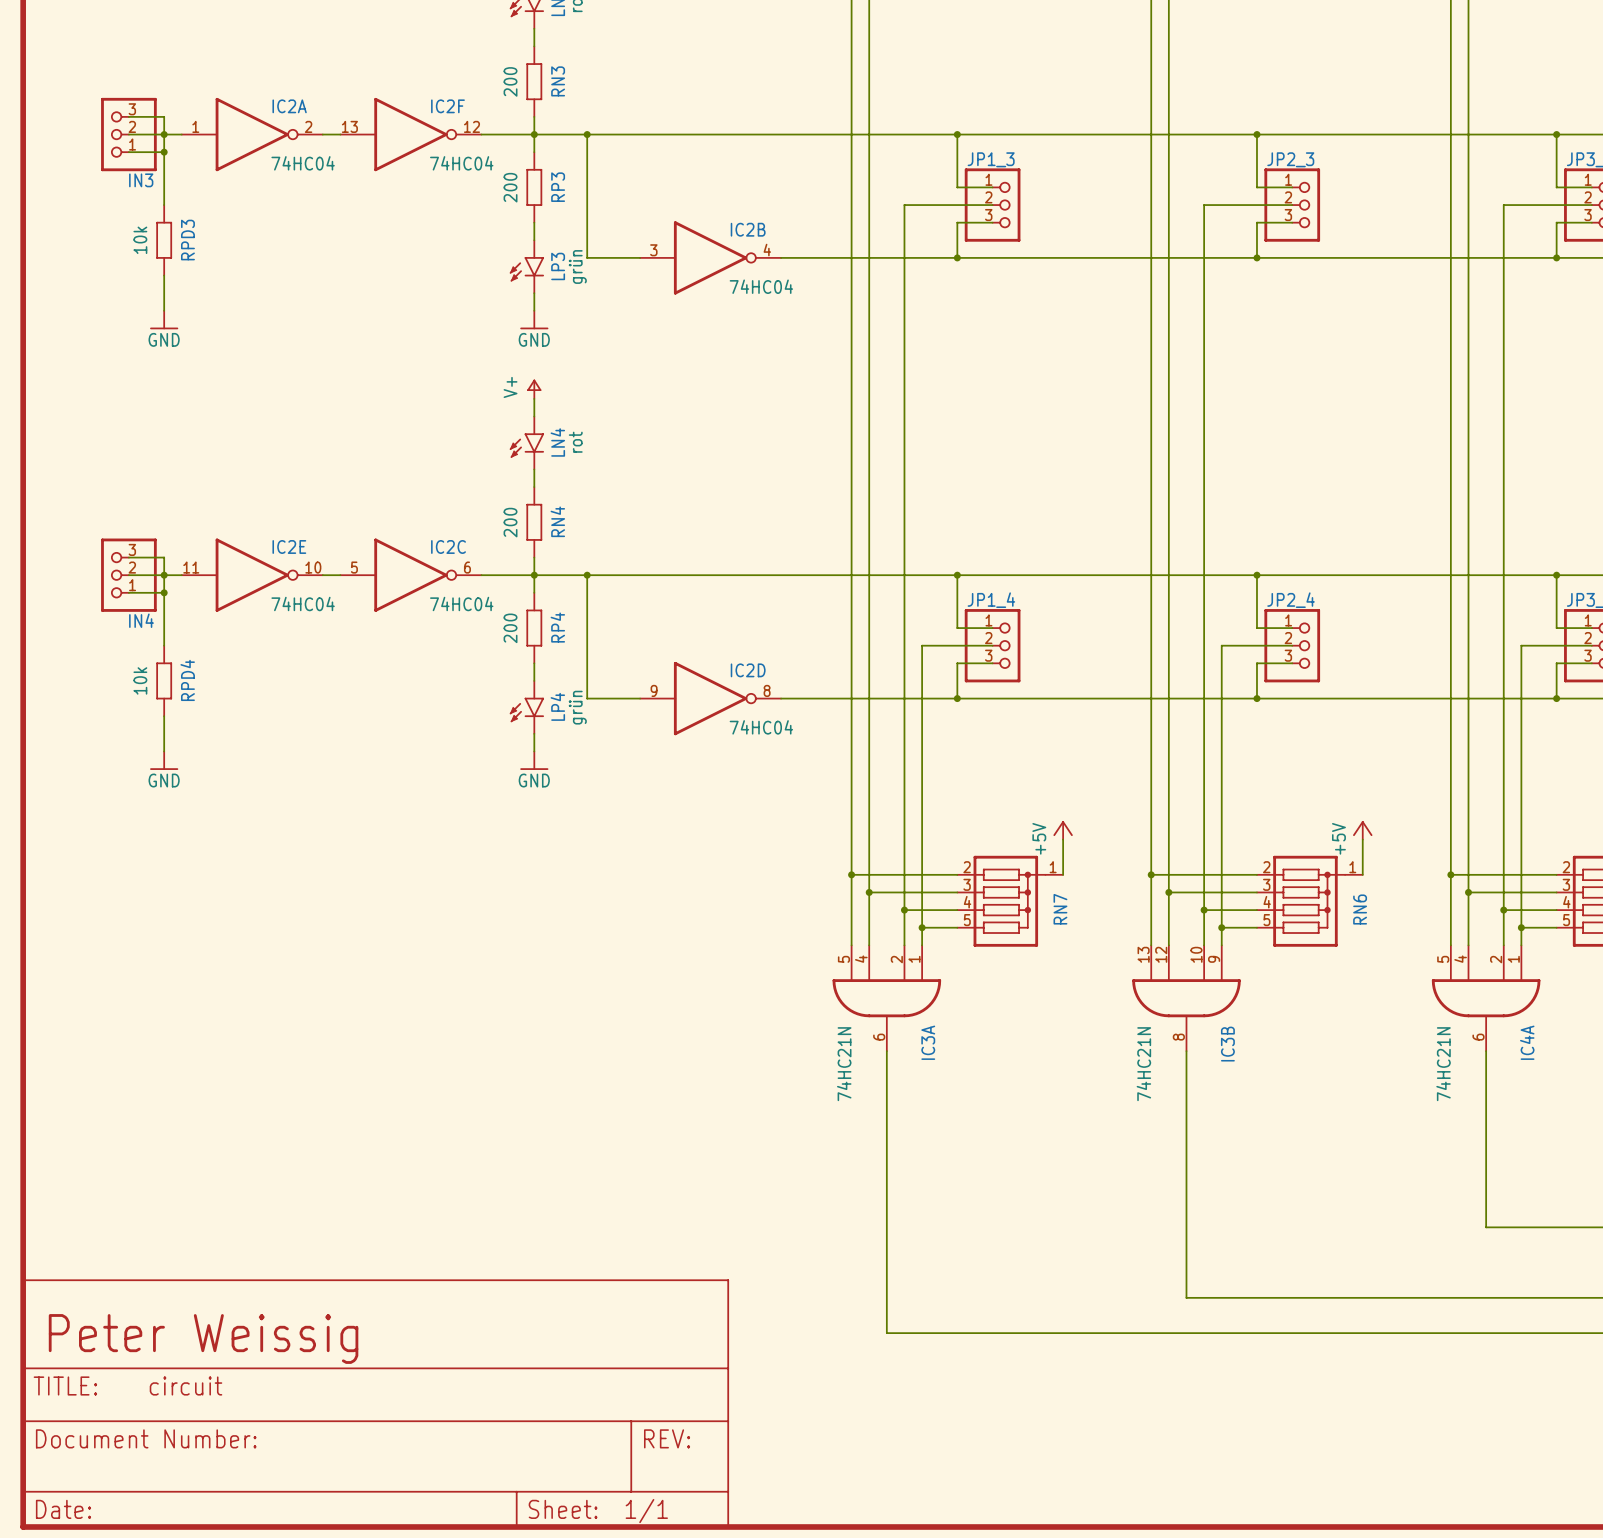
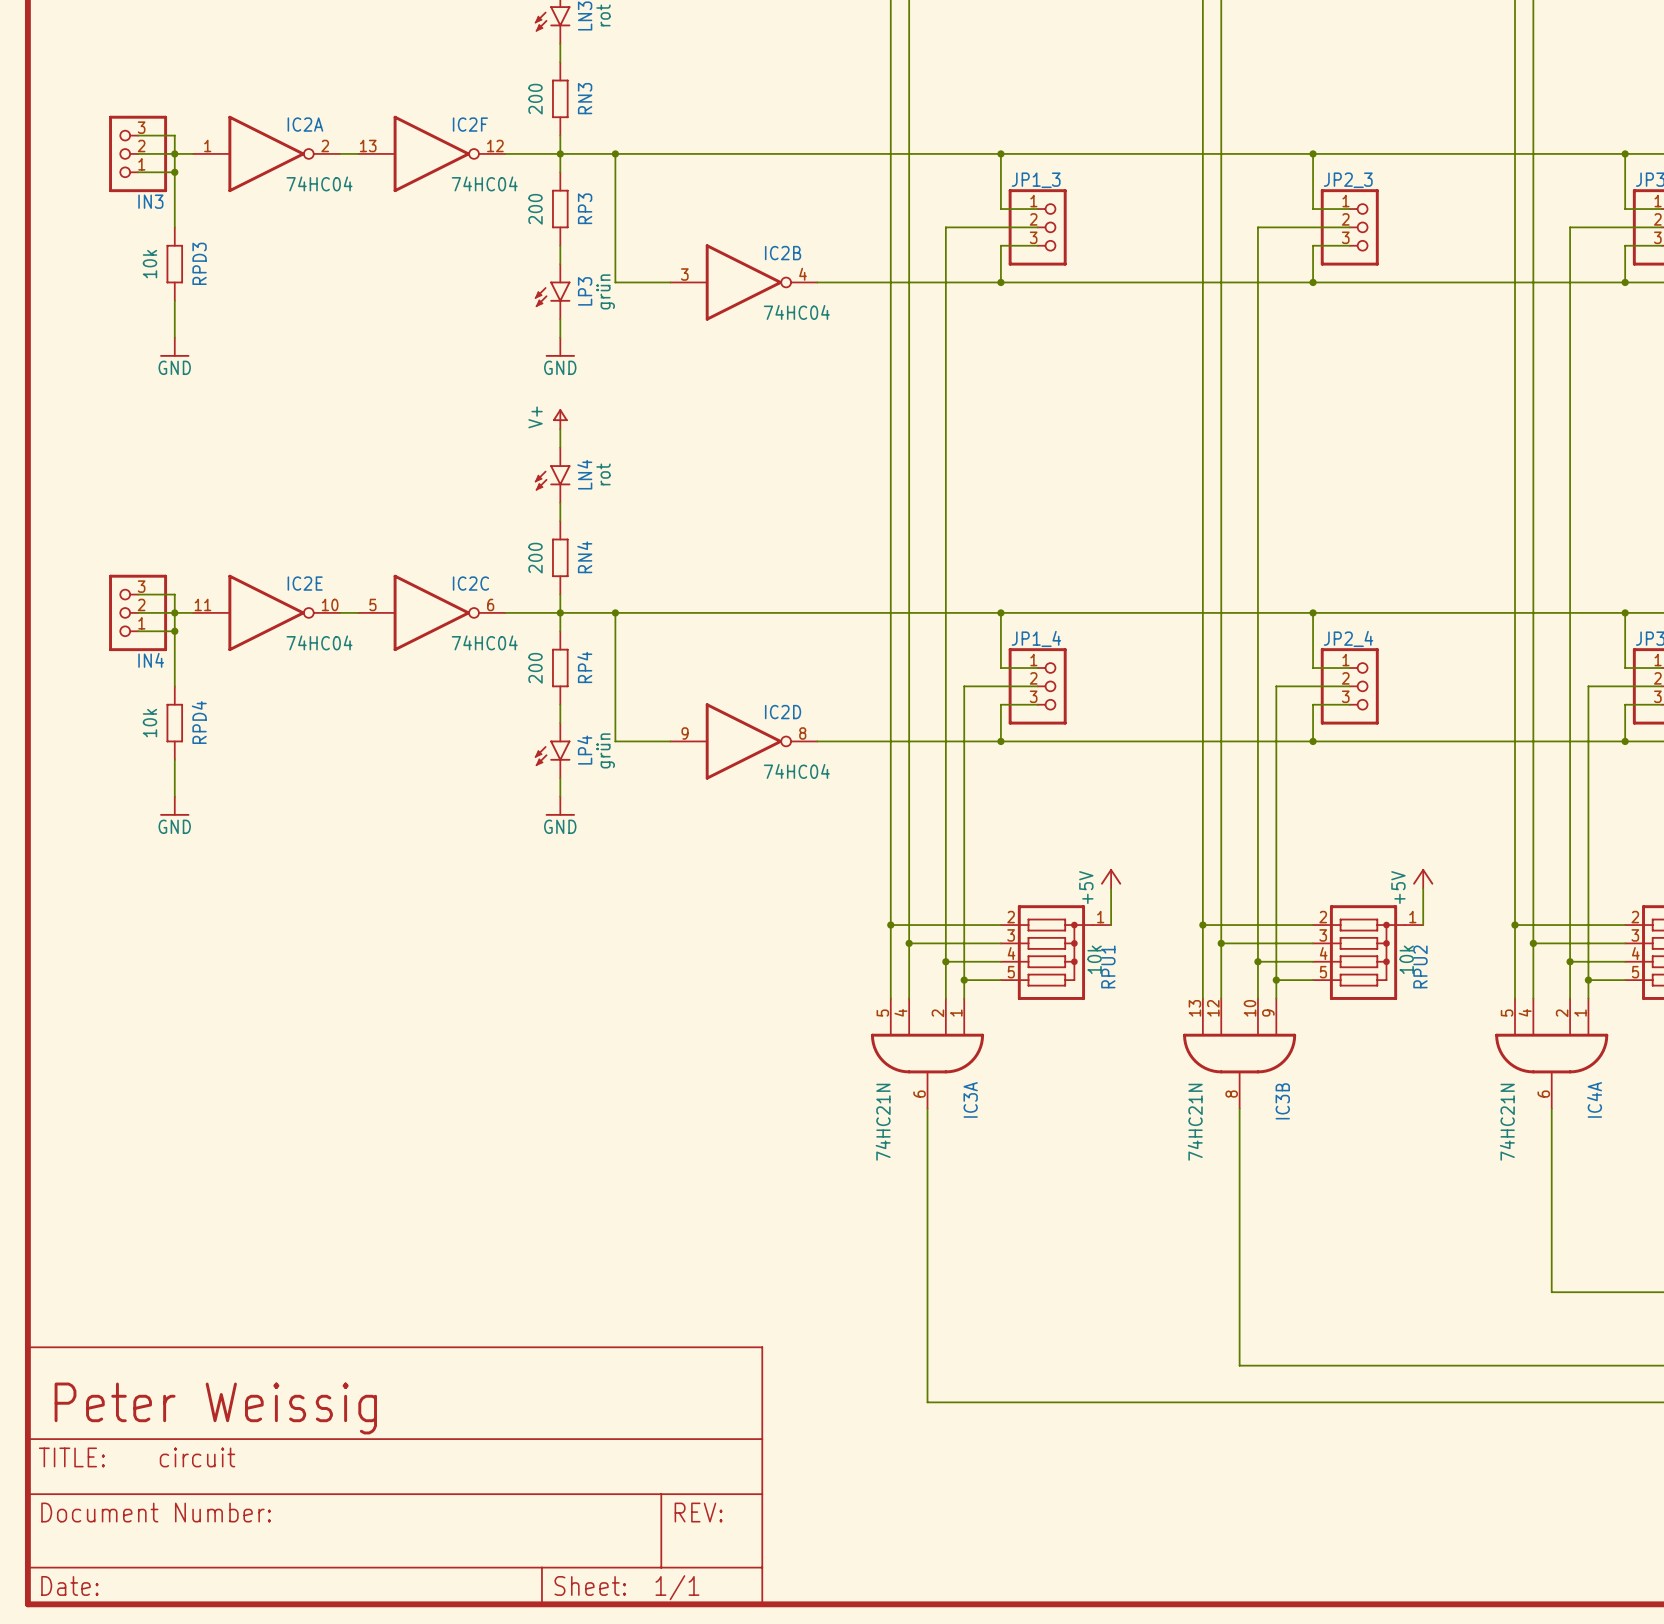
RN7 value: none -> 10k (1094, 959)
RN6 value: none -> 10k (1406, 959)
RN7 name: RN7 (1060, 909) -> RPU1 (1108, 966)
RN6 name: RN6 (1360, 909) -> RPU2 (1420, 966)

